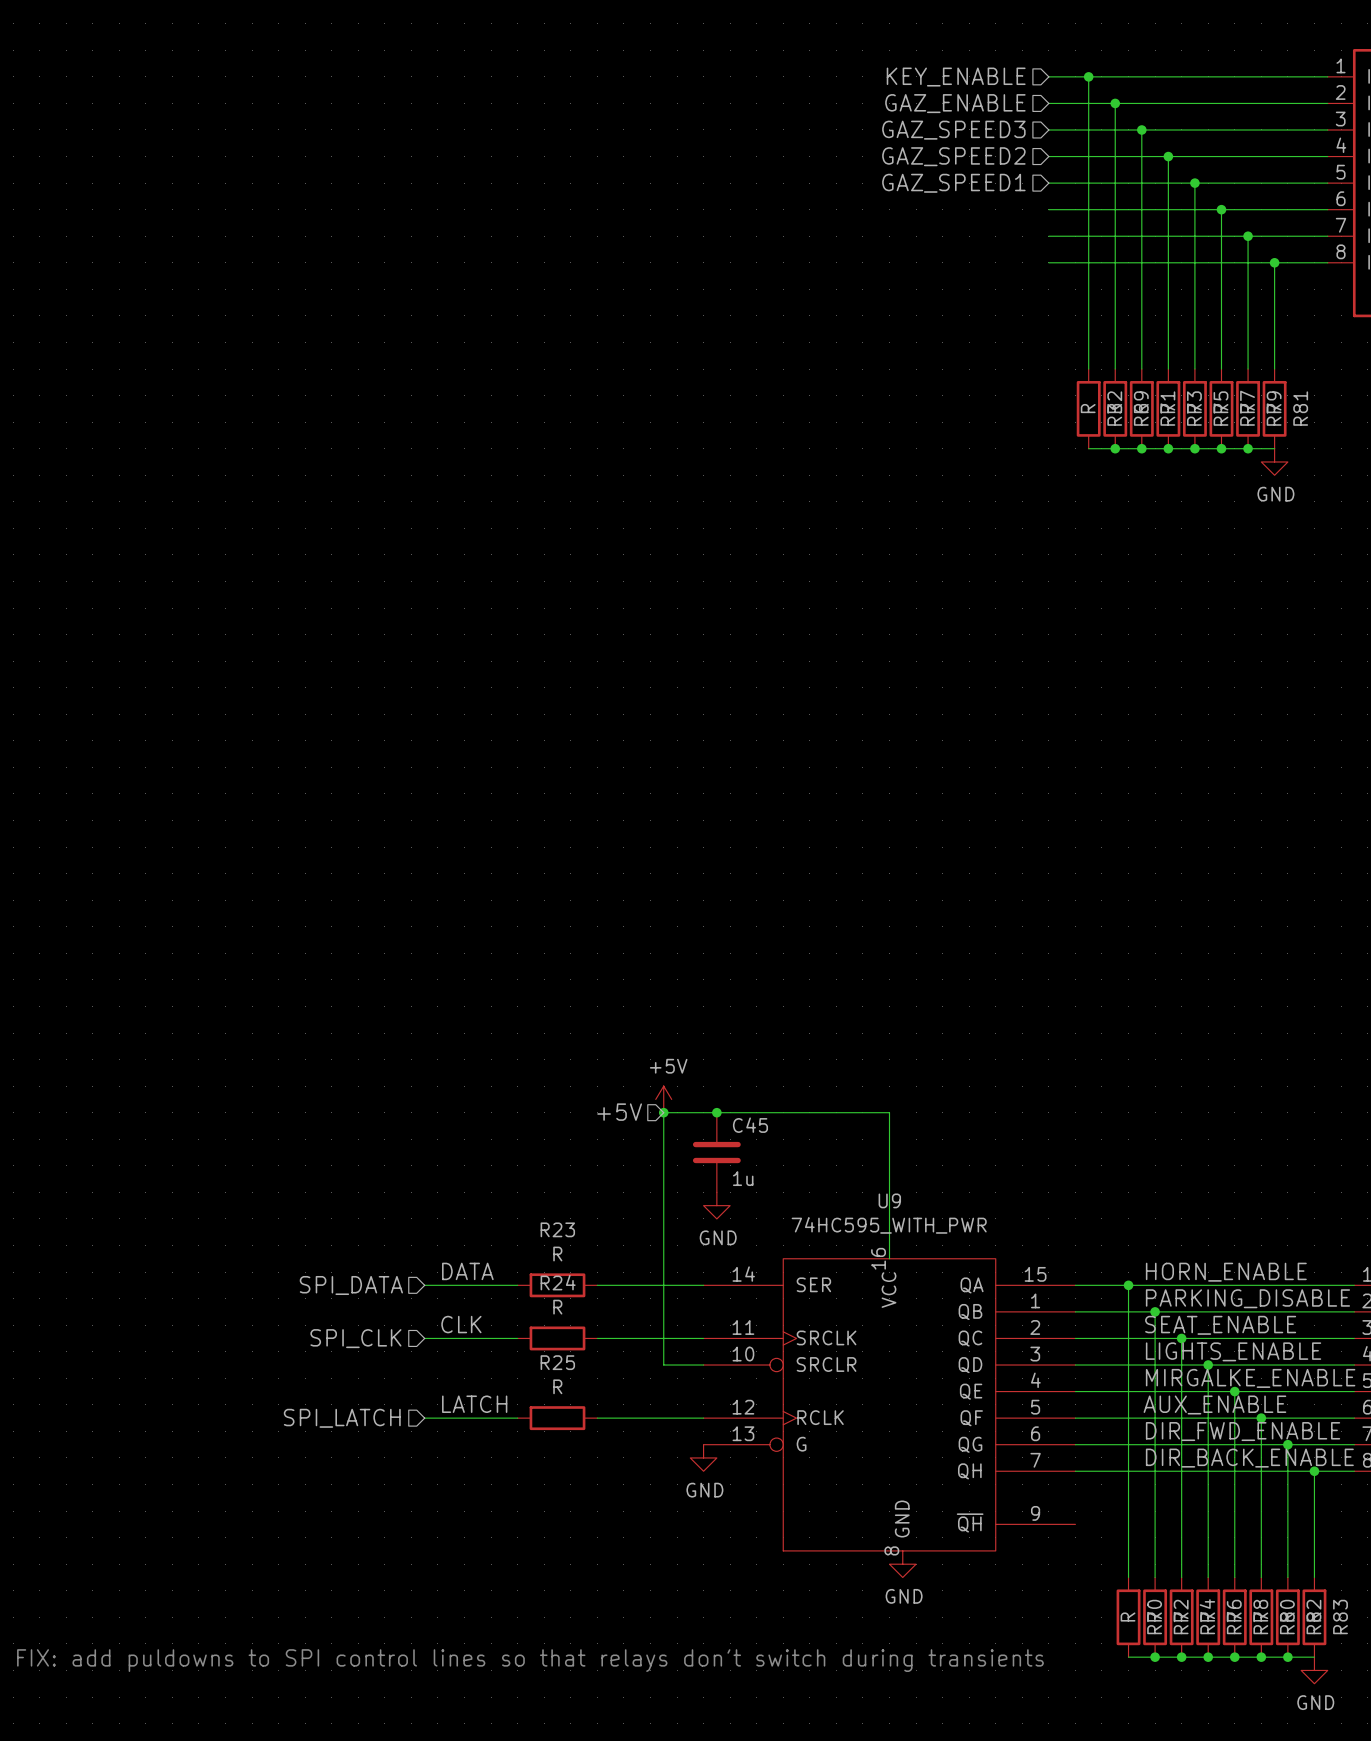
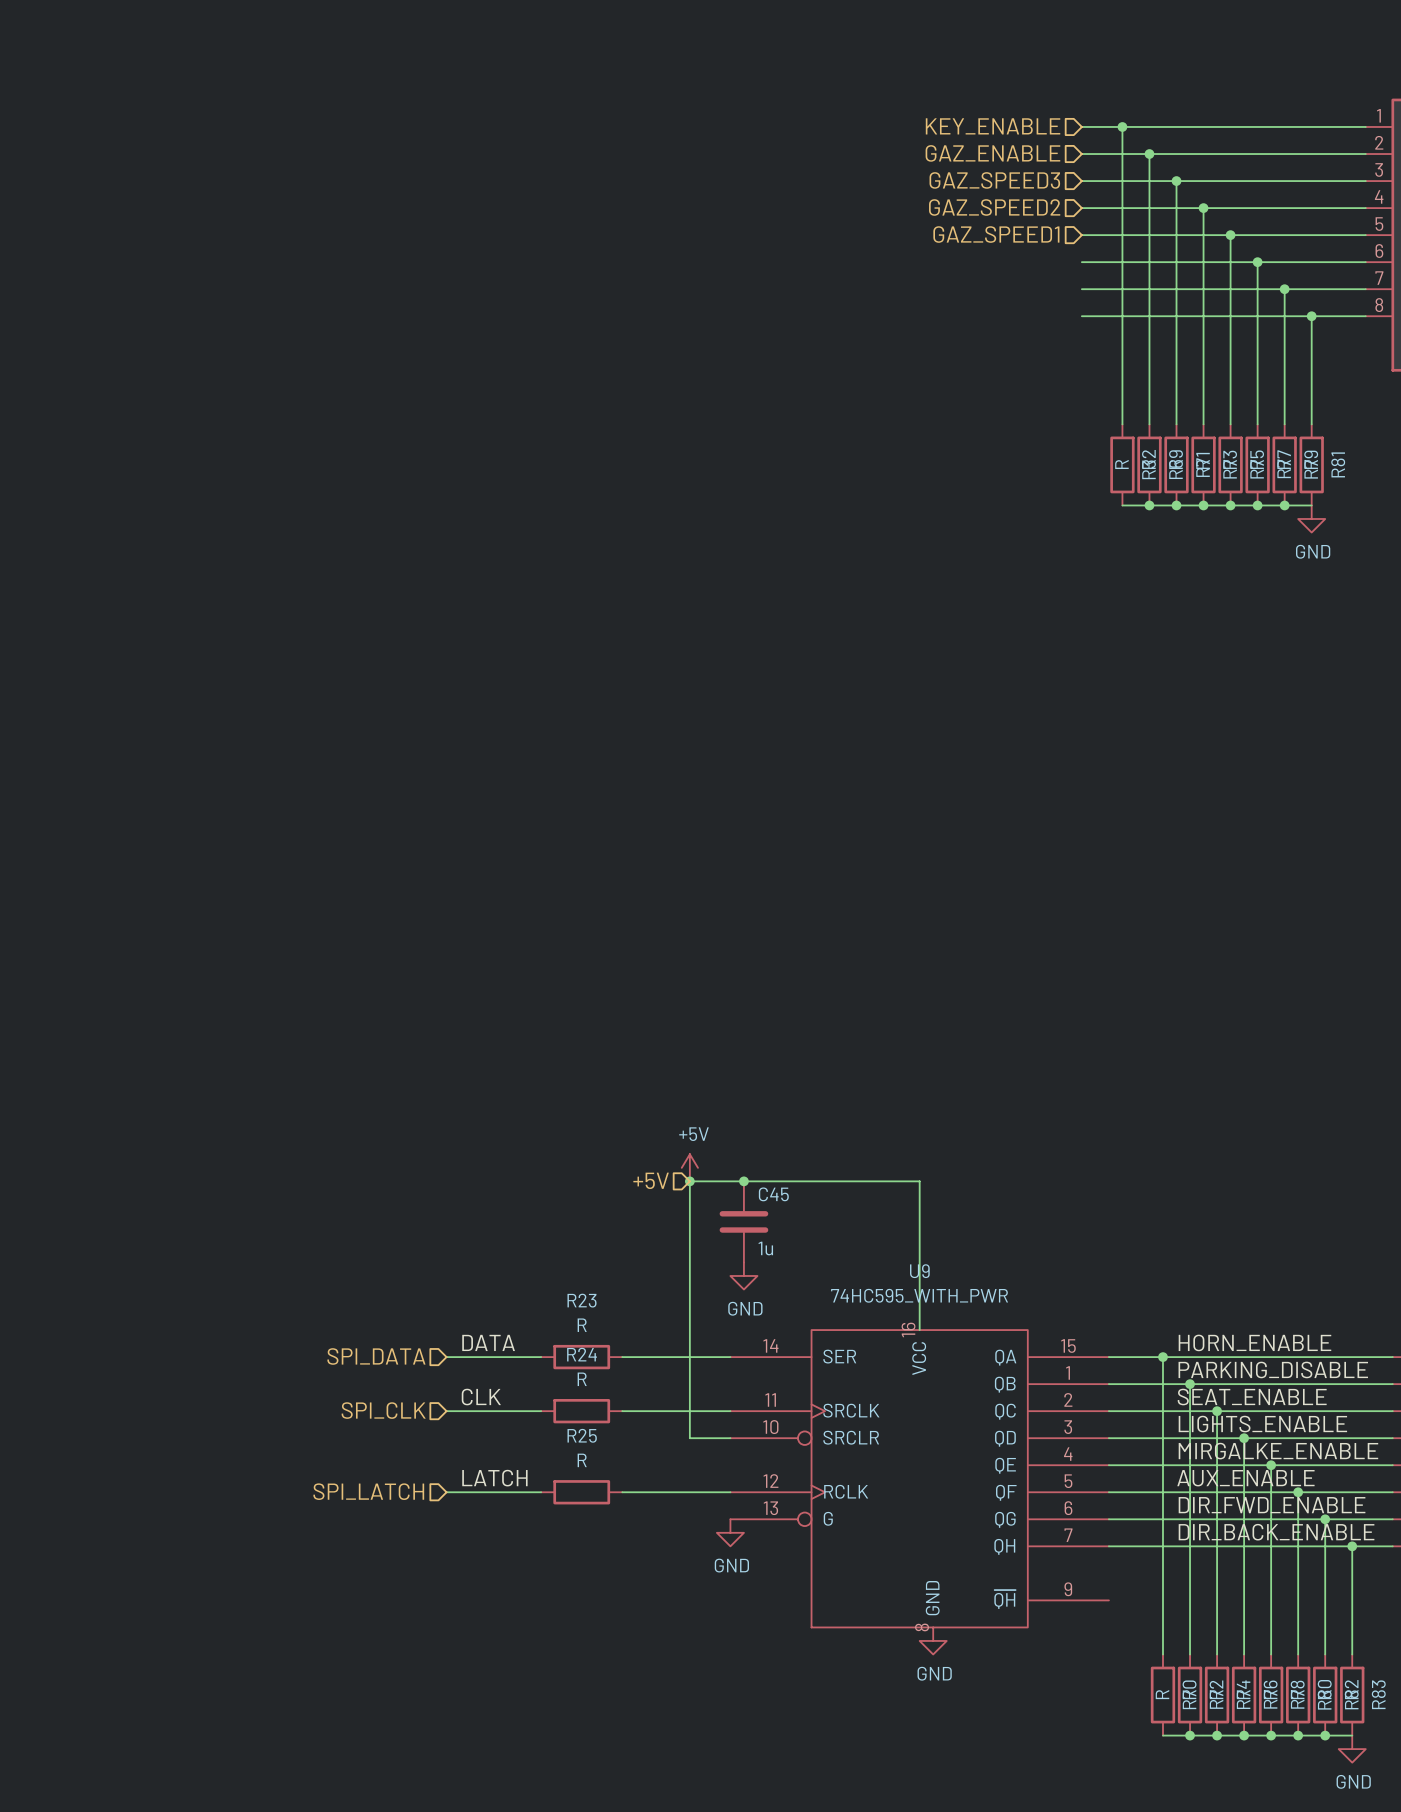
text: FIX: add puldowns to SPI control lines so that relays don't switch during transients (530, 1660) -> none

